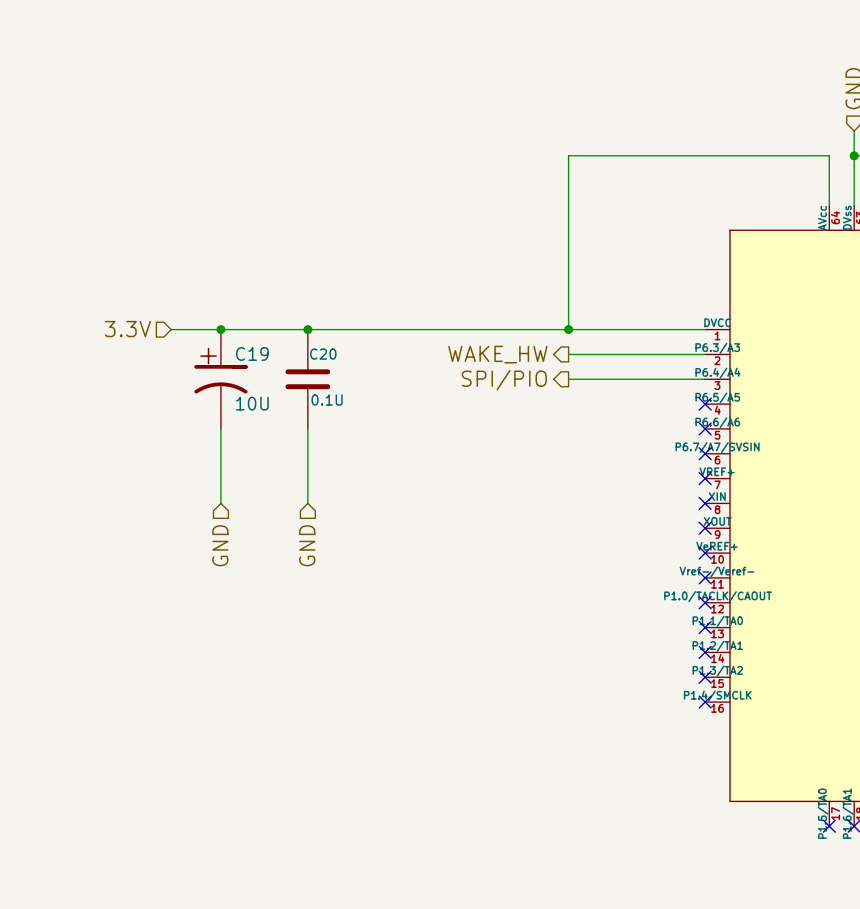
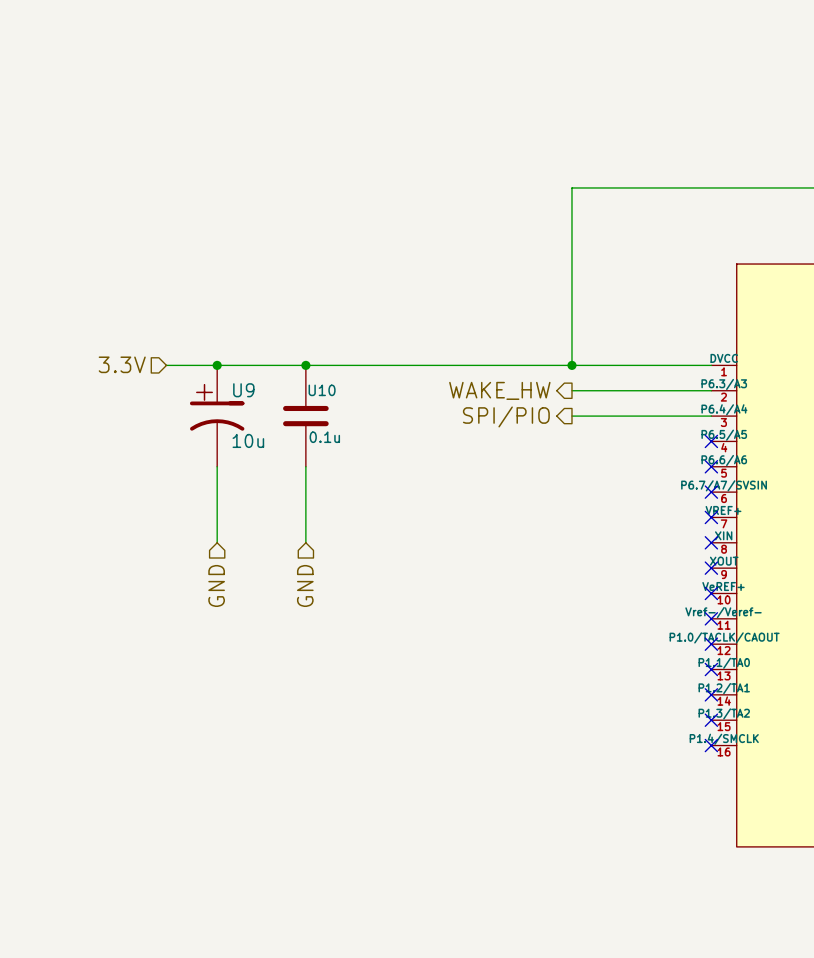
C19 name: C19 (252, 353) -> U9 (243, 390)
C20 name: C20 (323, 354) -> U10 (322, 390)
C20 value: 0.1U (327, 400) -> 0.1u (324, 437)
C19 value: 10U (252, 403) -> 10u (248, 440)

